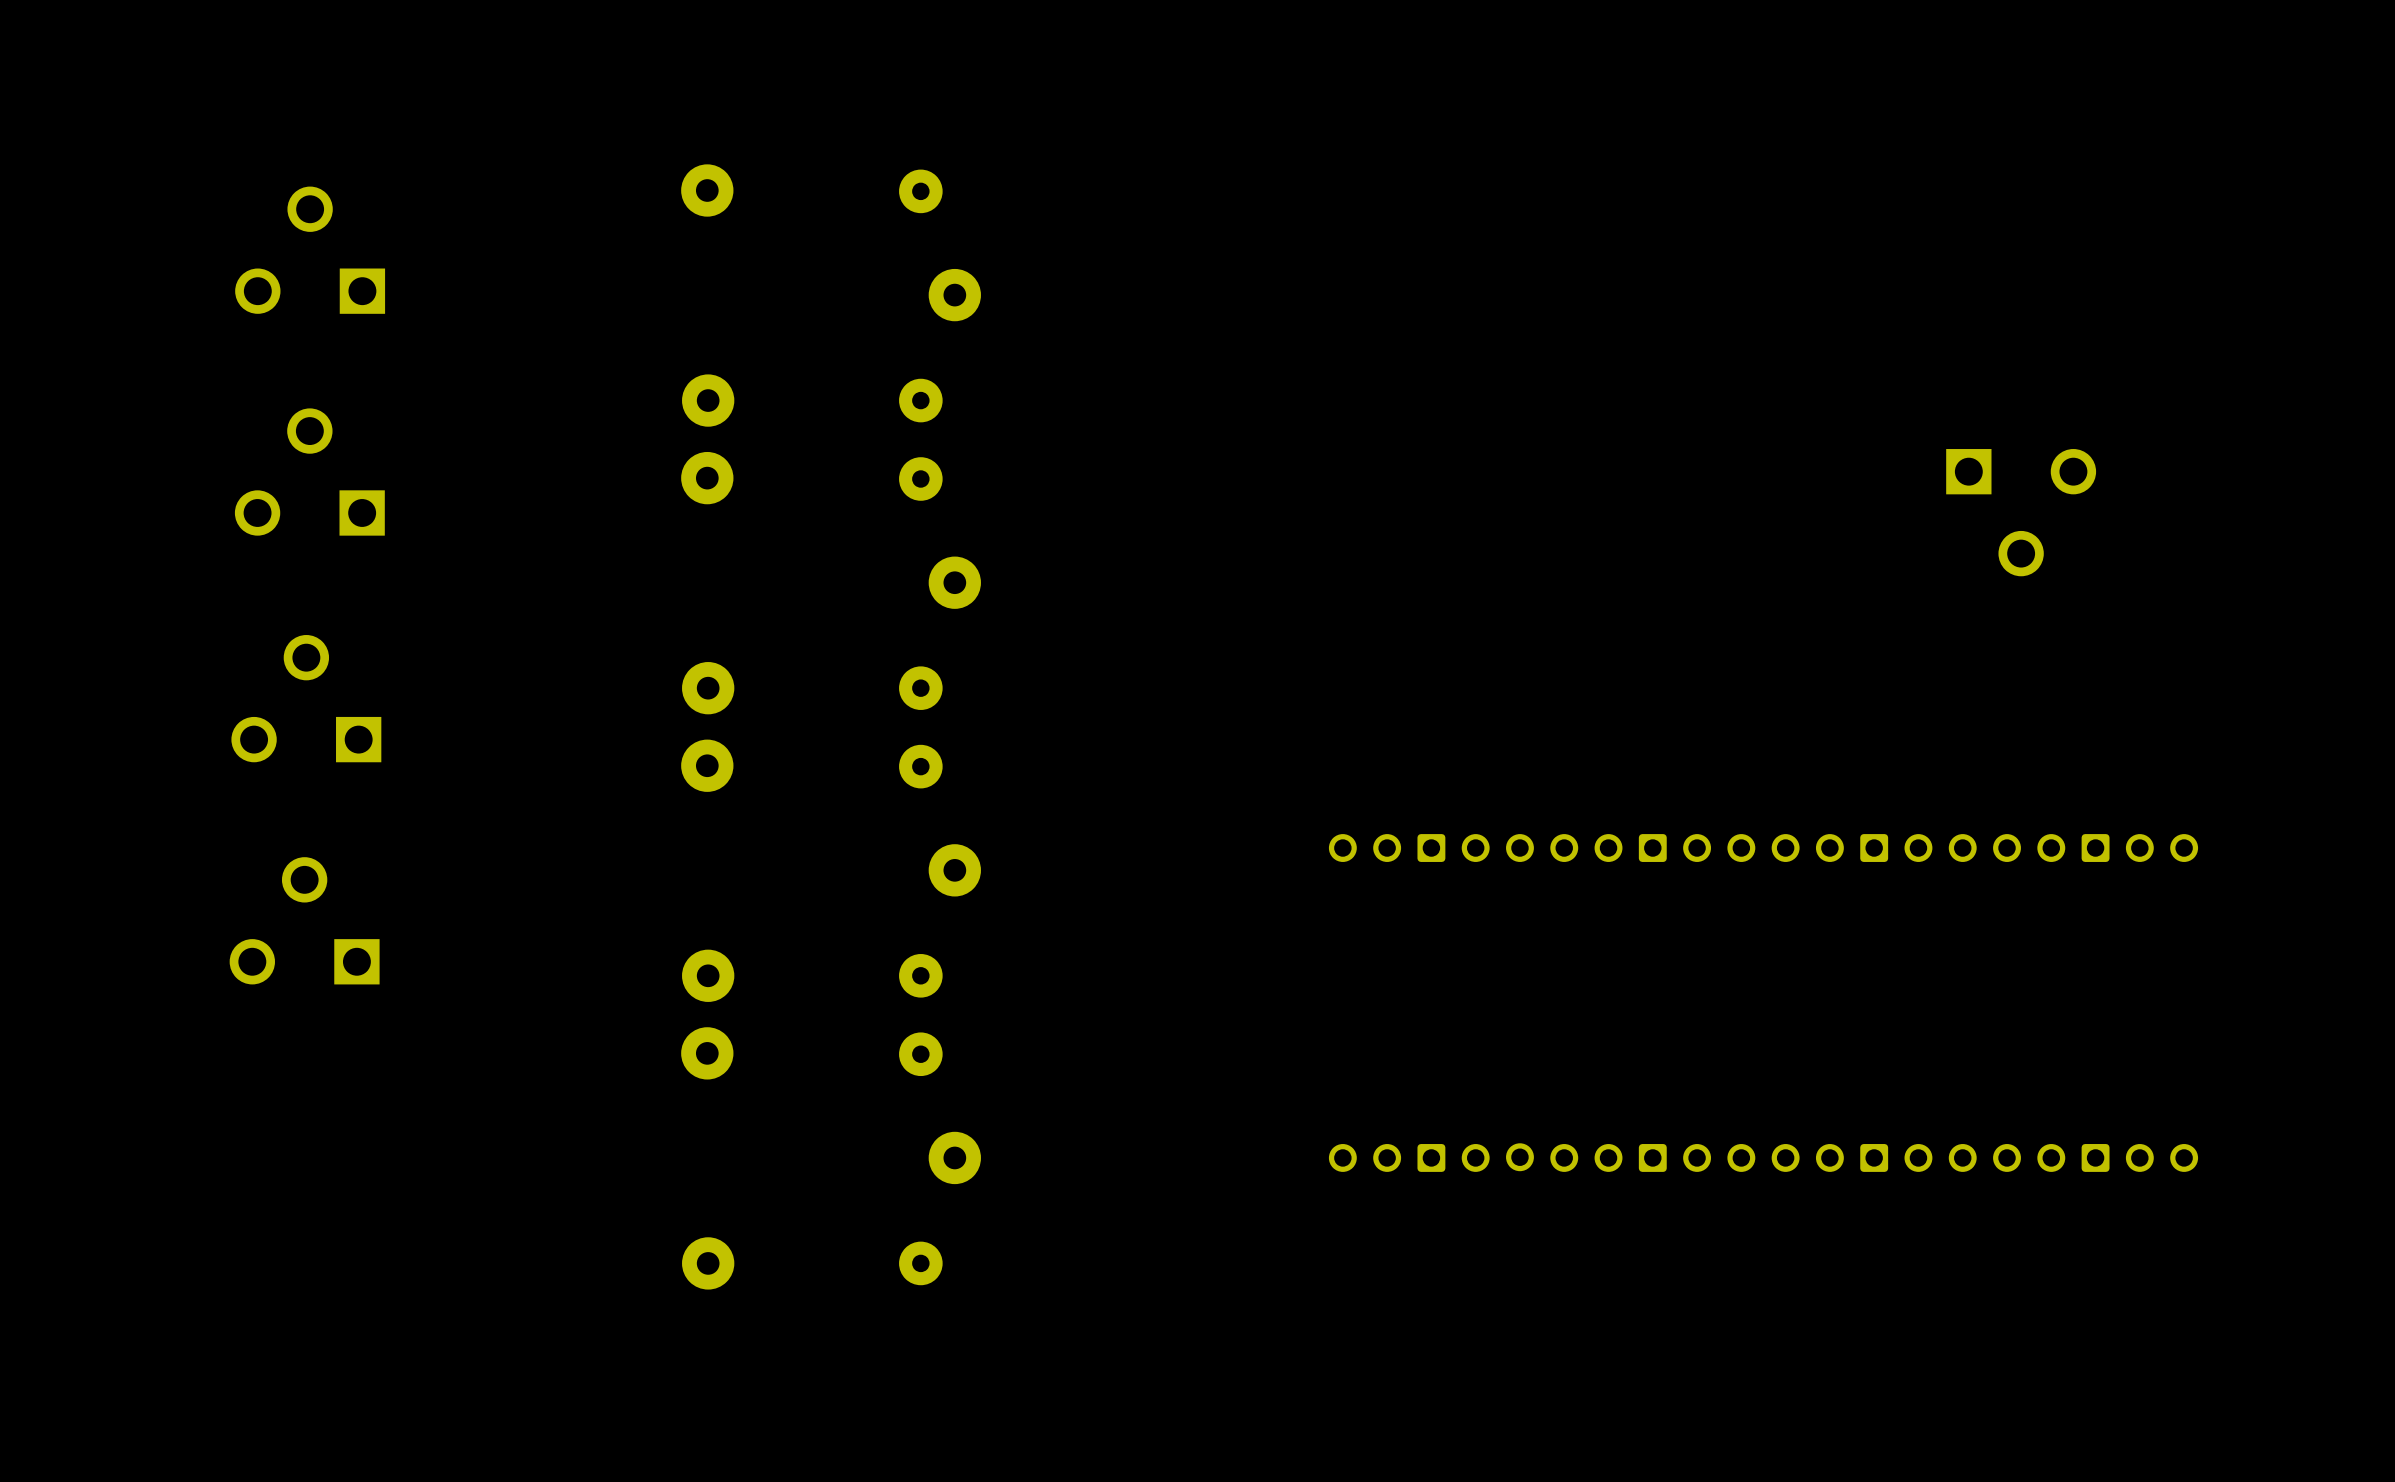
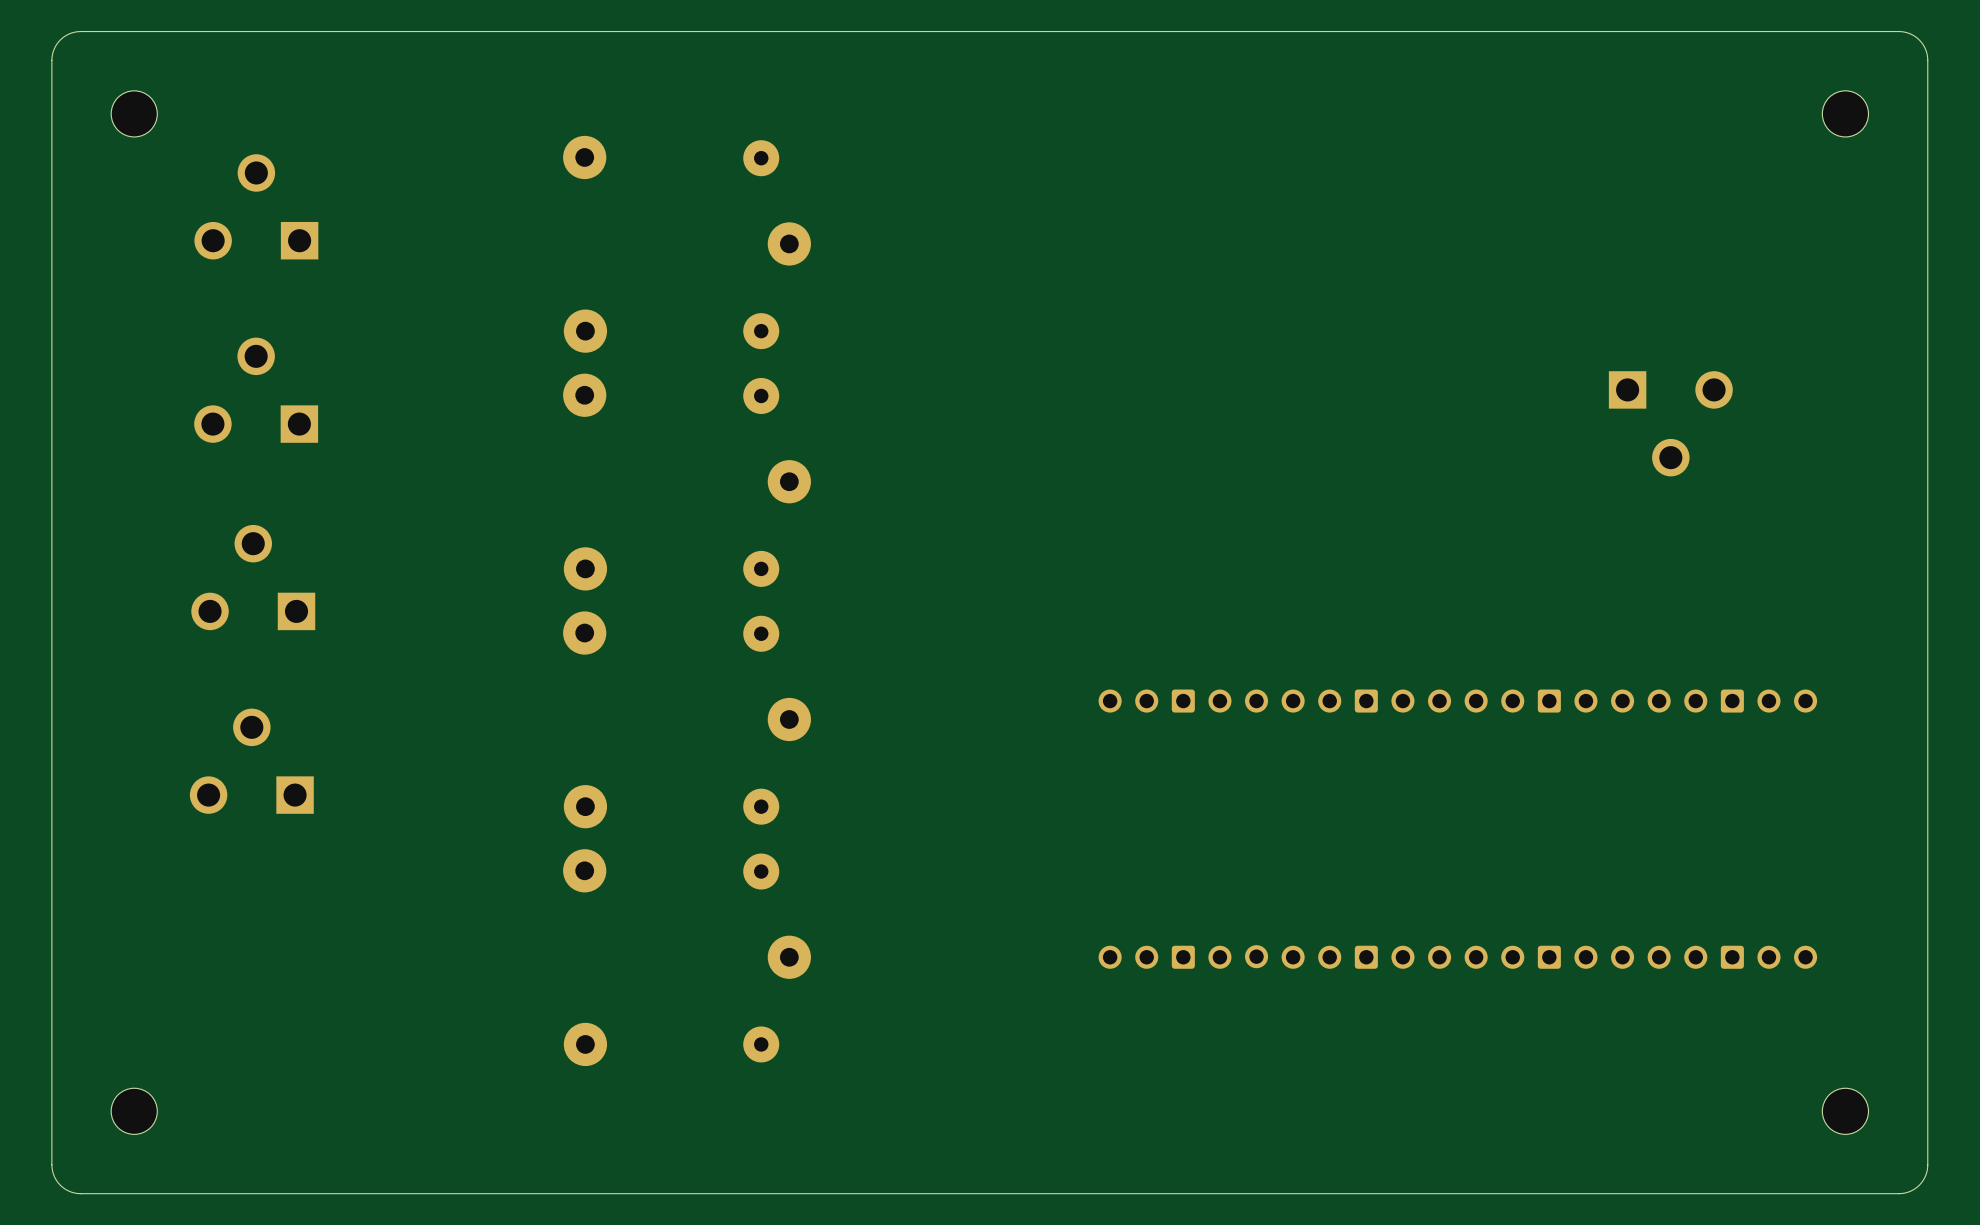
board edge: none -> (1898, 31) (80, 31) (65, 35) (54, 47) (51, 60) (51, 1164) (56, 1180) (68, 1190) (80, 1193) (1898, 1193) (1914, 1189) (1924, 1177) (1927, 1164) (1927, 60) (1926, 50) (1919, 39) (1908, 33) (1898, 31)
part: none -> (134, 113)
part: none -> (1845, 113)
part: none -> (134, 1111)
part: none -> (1845, 1111)

